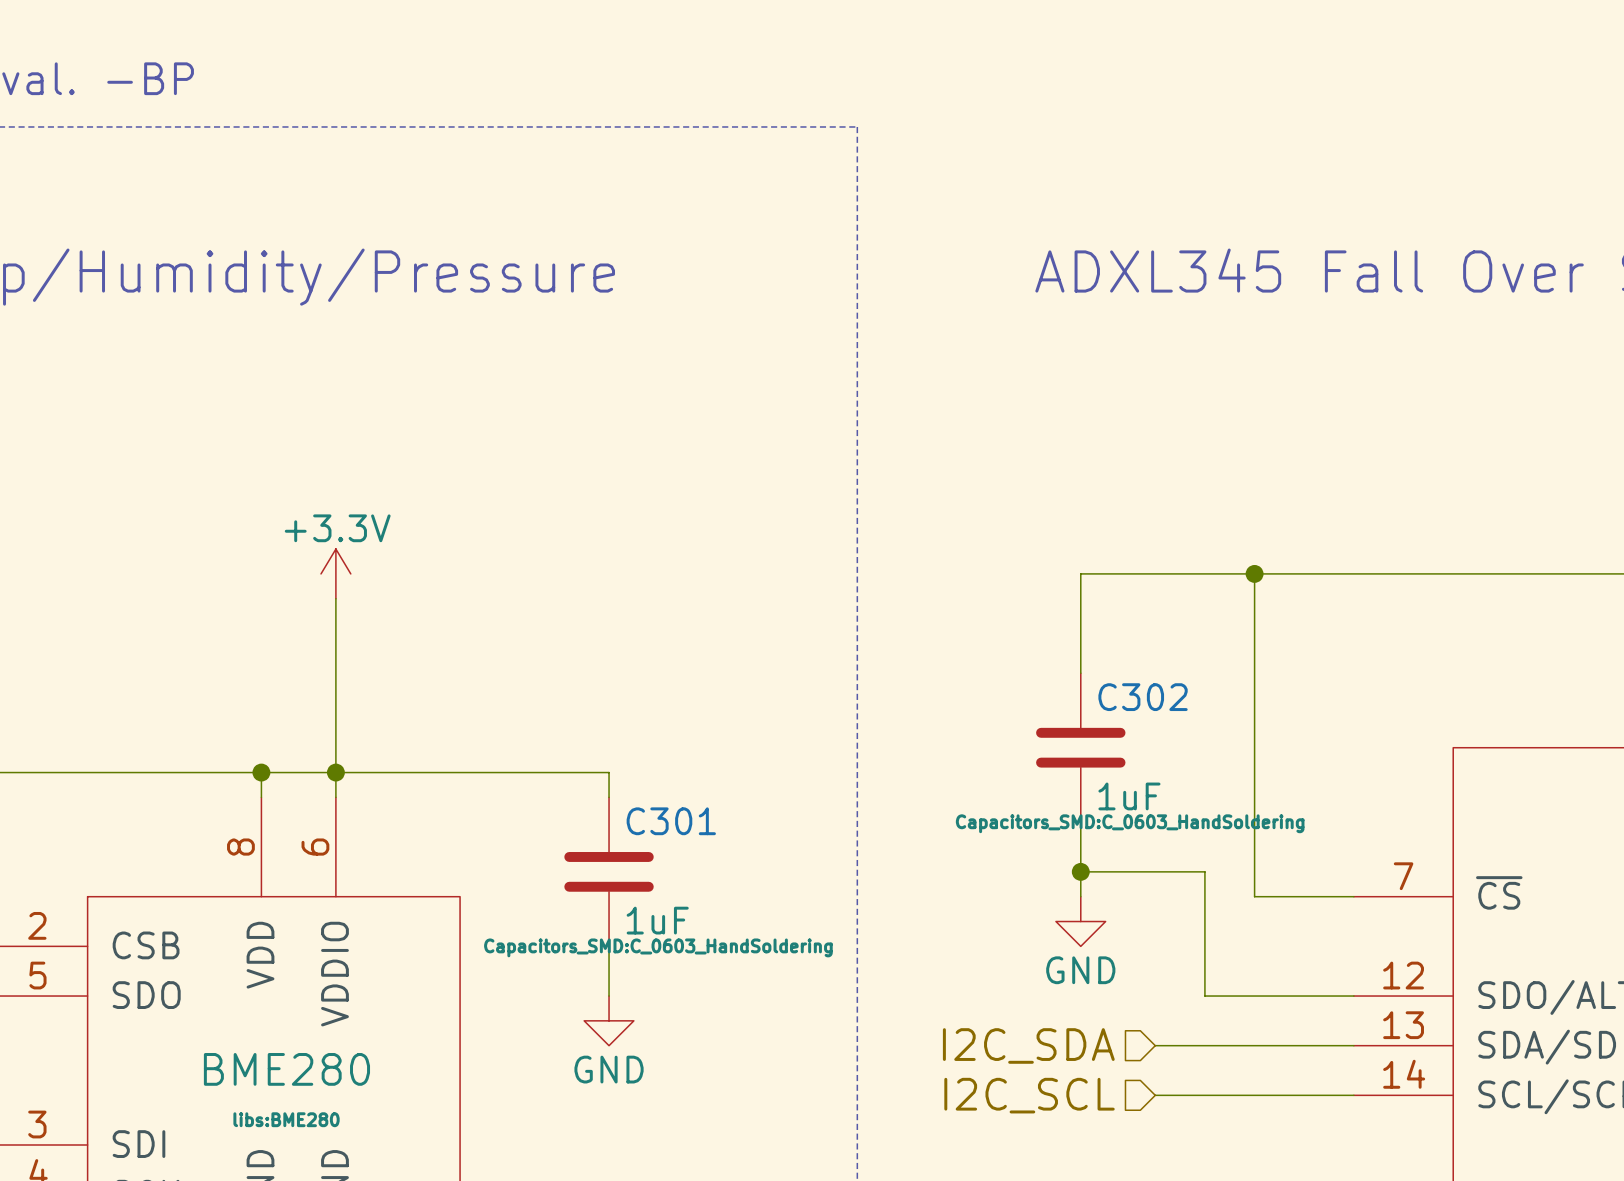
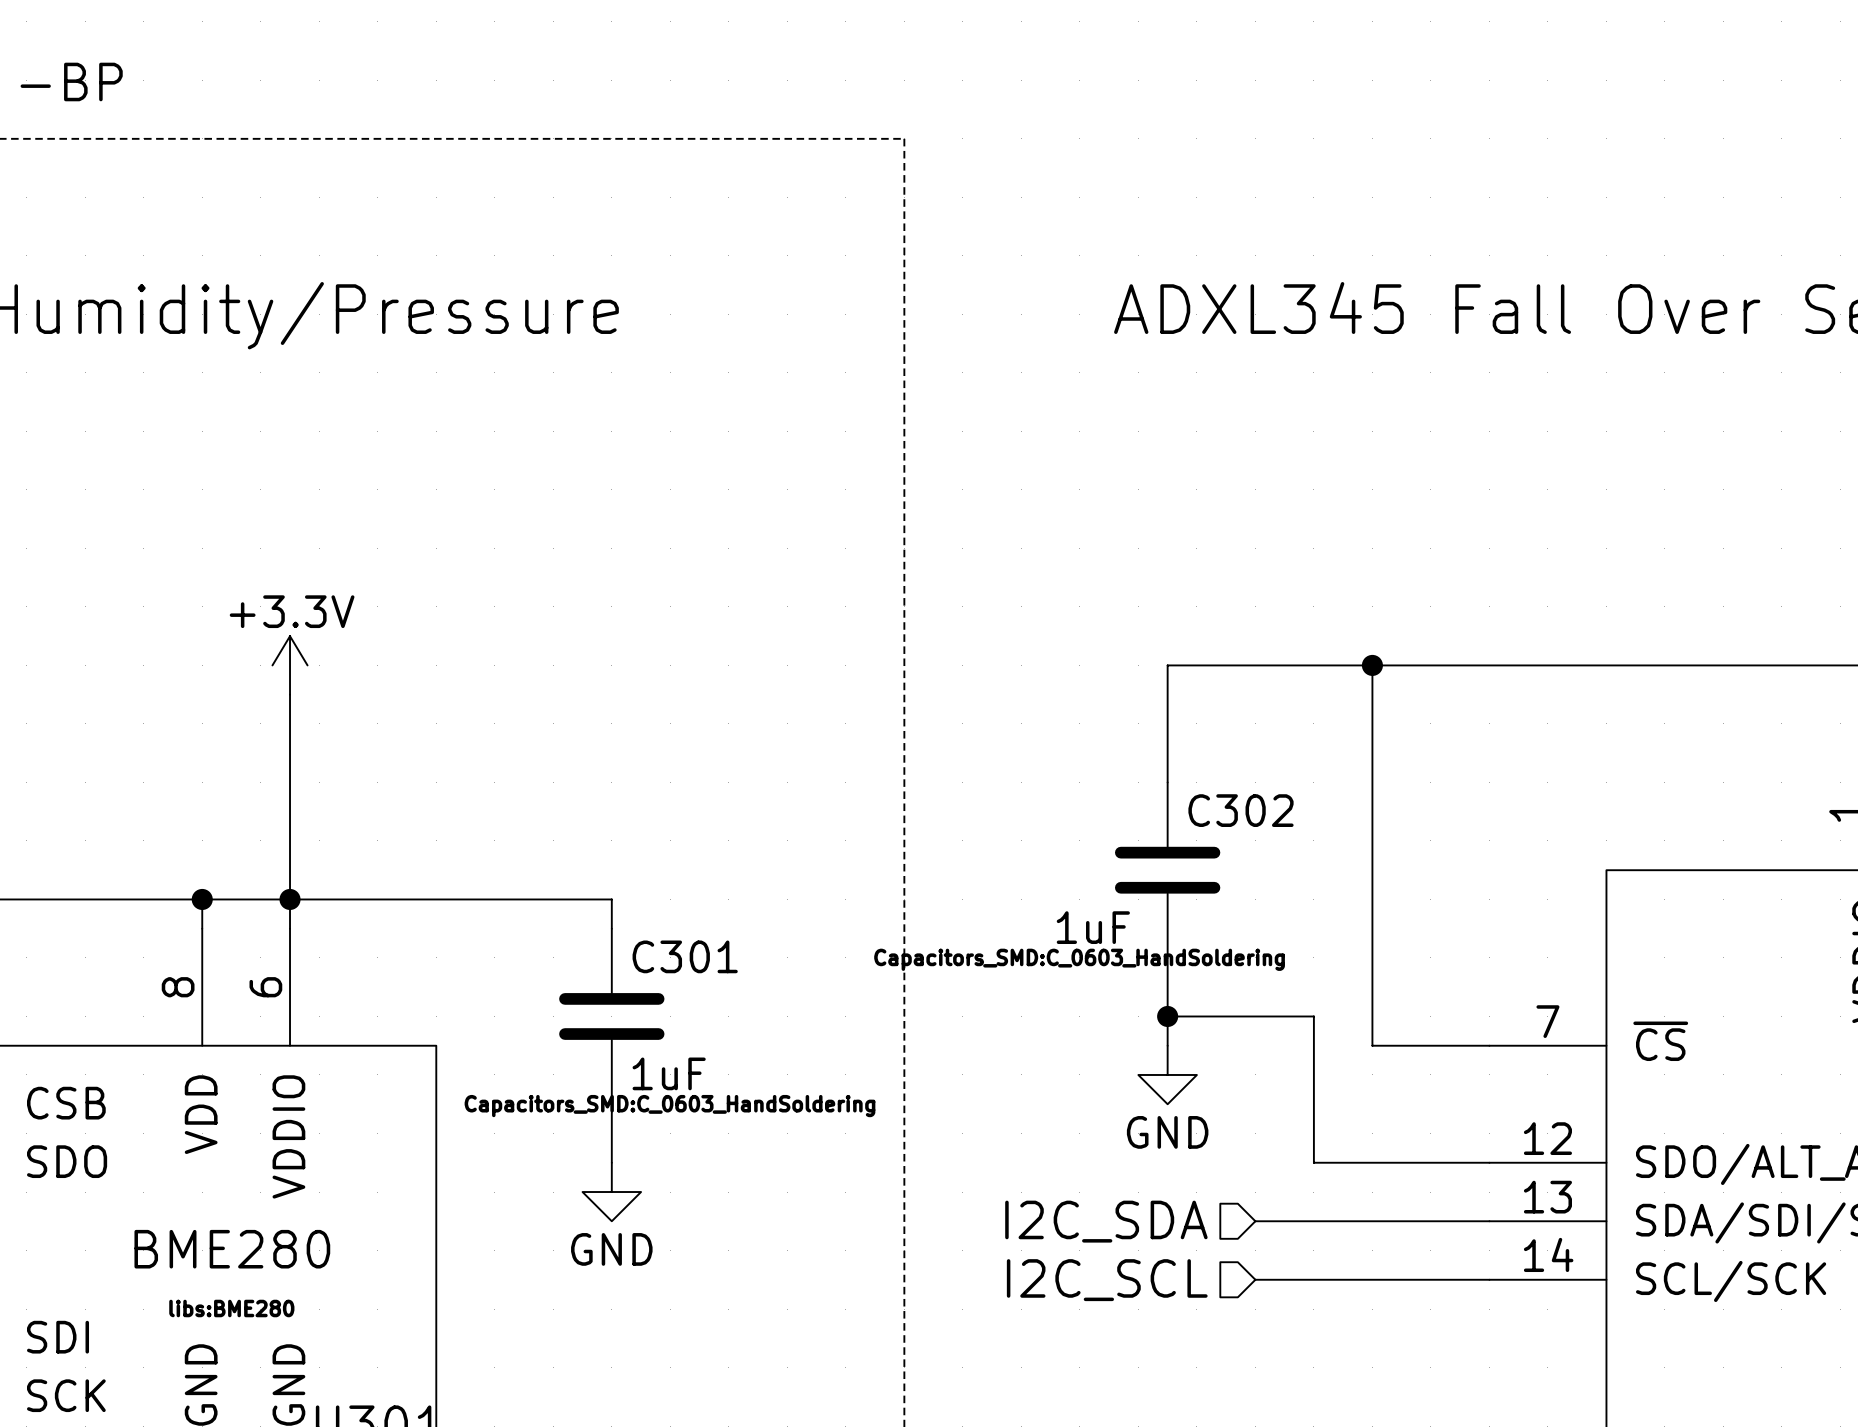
C302 value position: 1uF (1129, 796) -> 1uF (1093, 927)
C302 text position: Capacitors_SMD:C_0603_HandSoldering (1130, 823) -> Capacitors_SMD:C_0603_HandSoldering (1079, 959)

